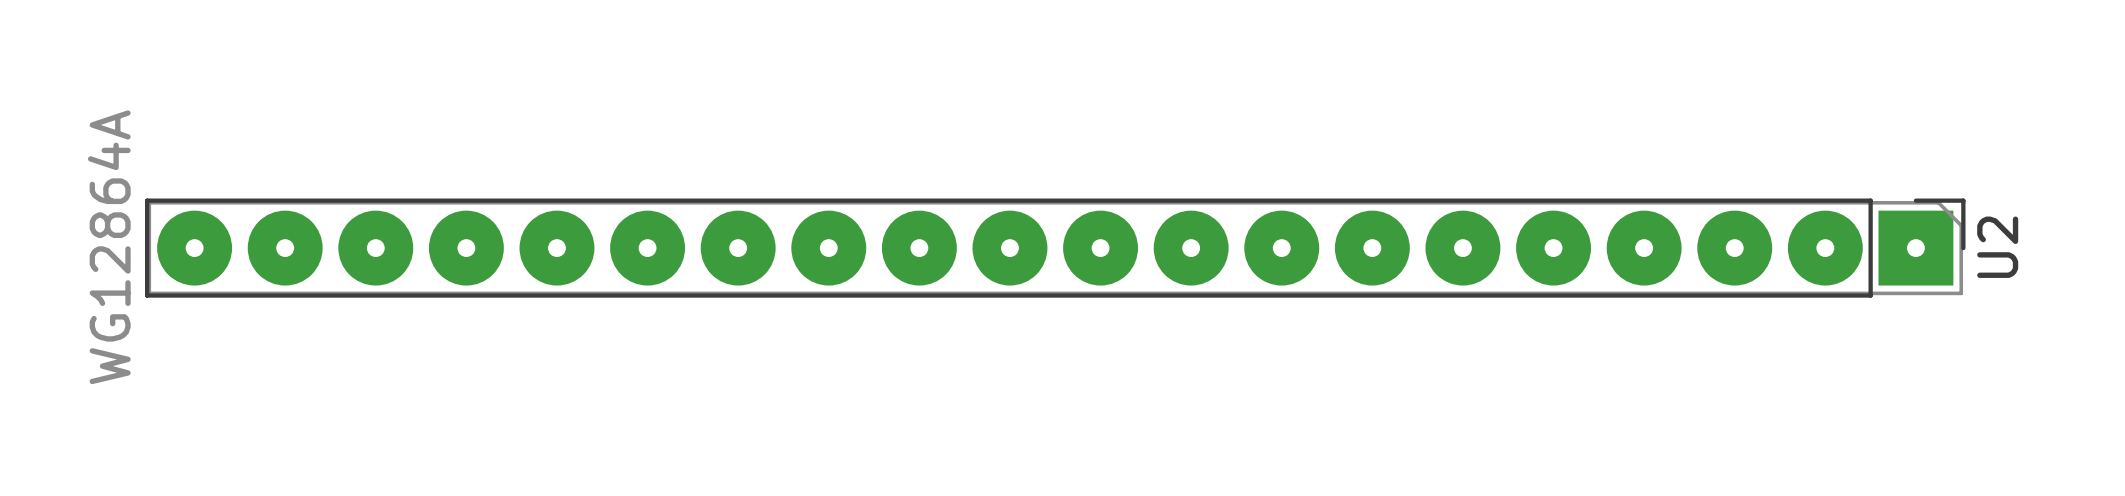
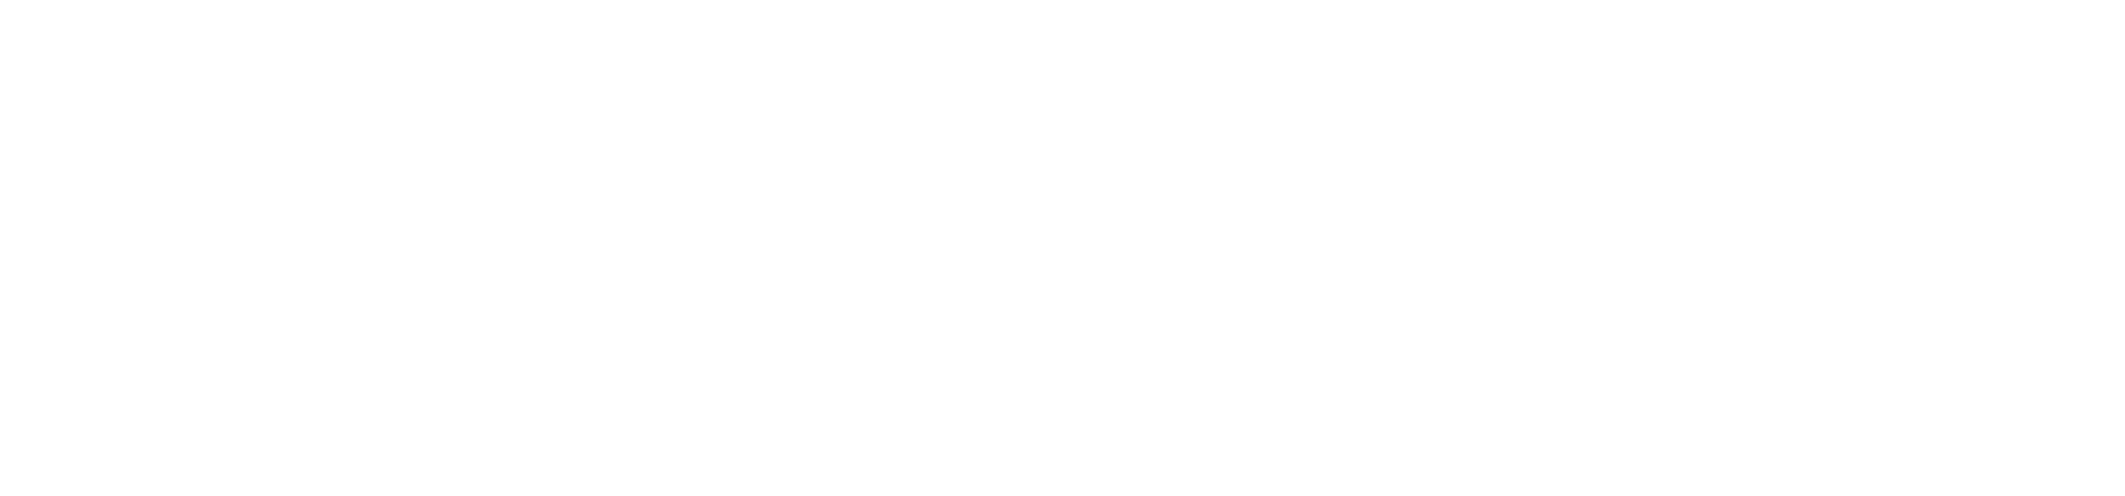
U2: WG12864A (1055, 248) -> none

